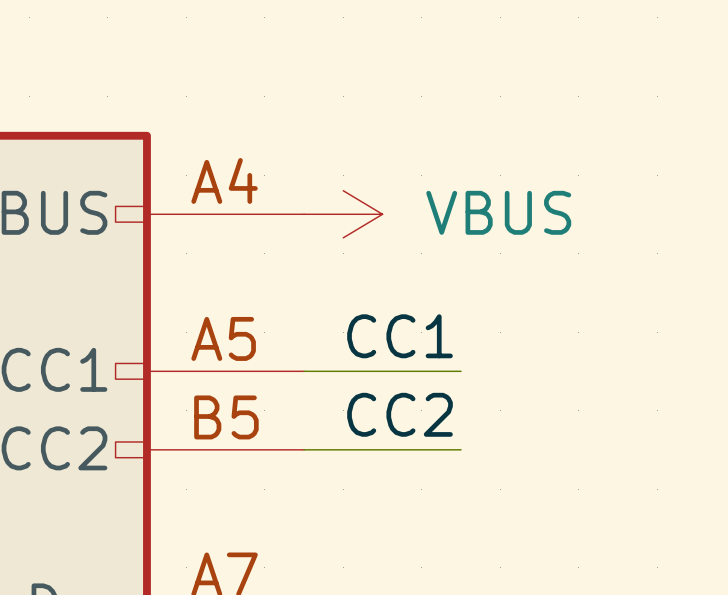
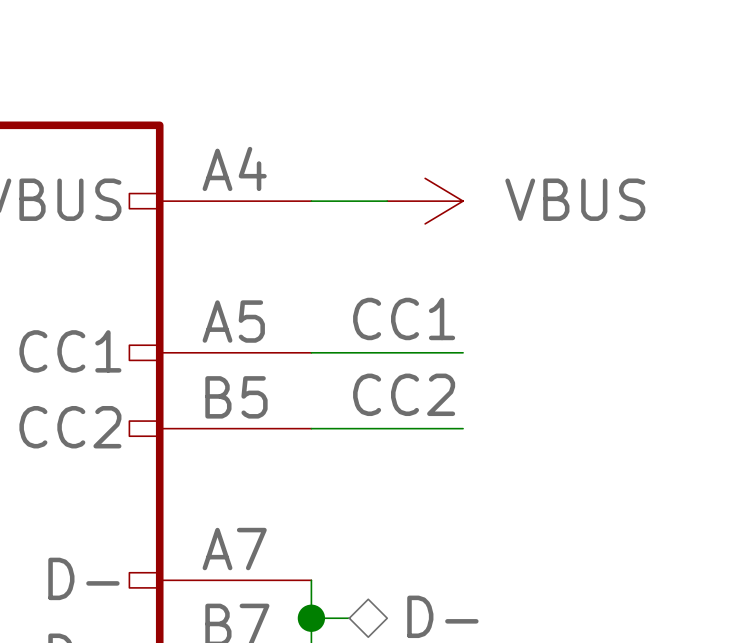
power symbol position: VBUS (343, 214) -> VBUS (425, 201)

